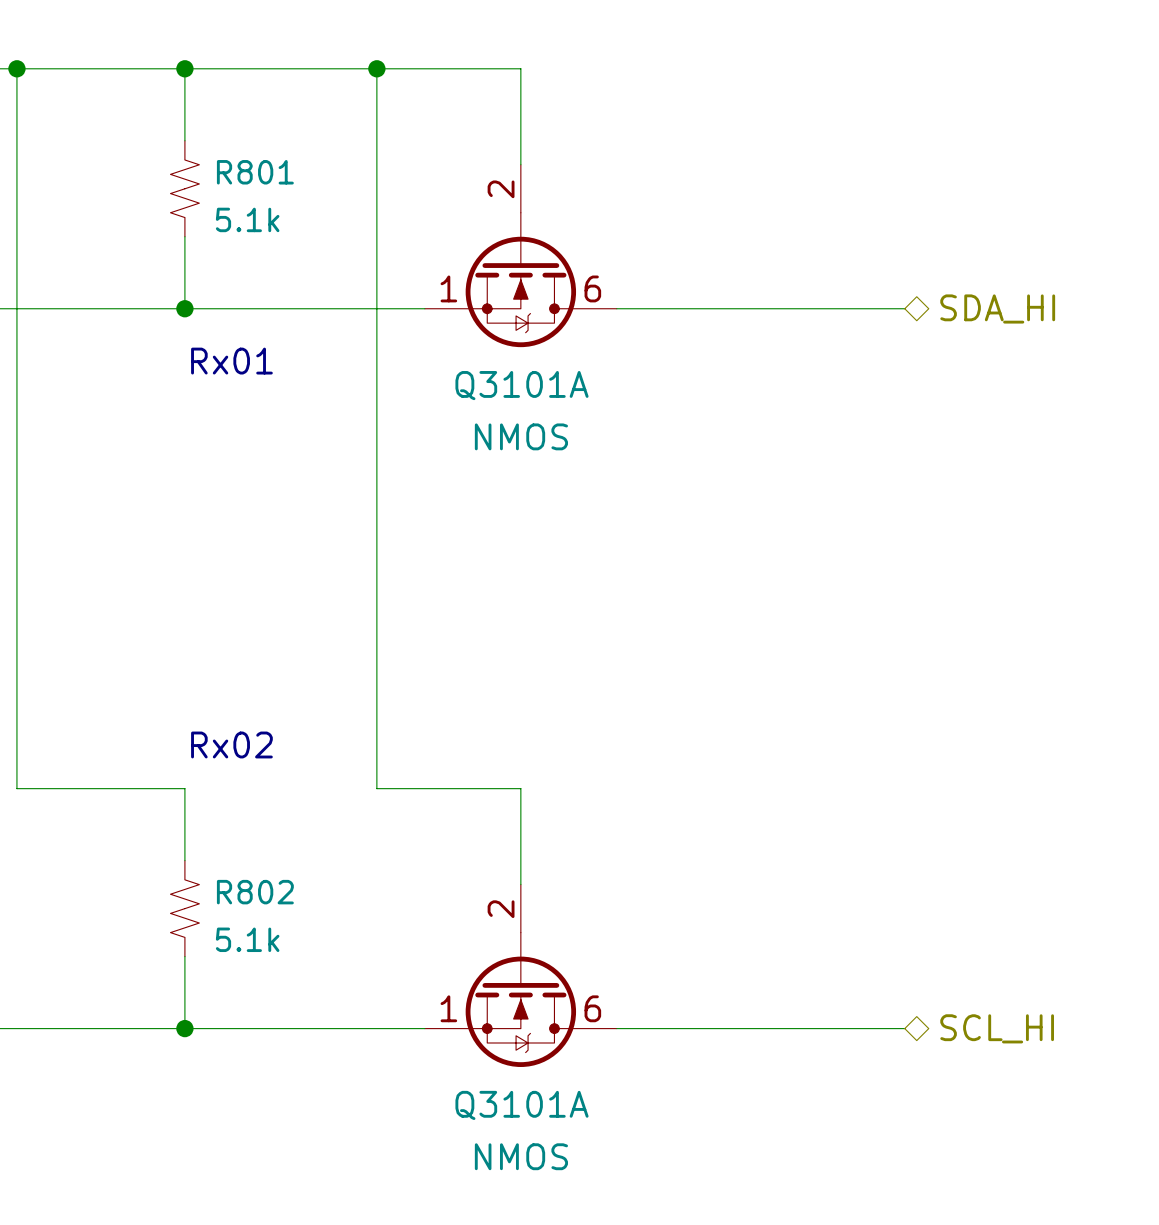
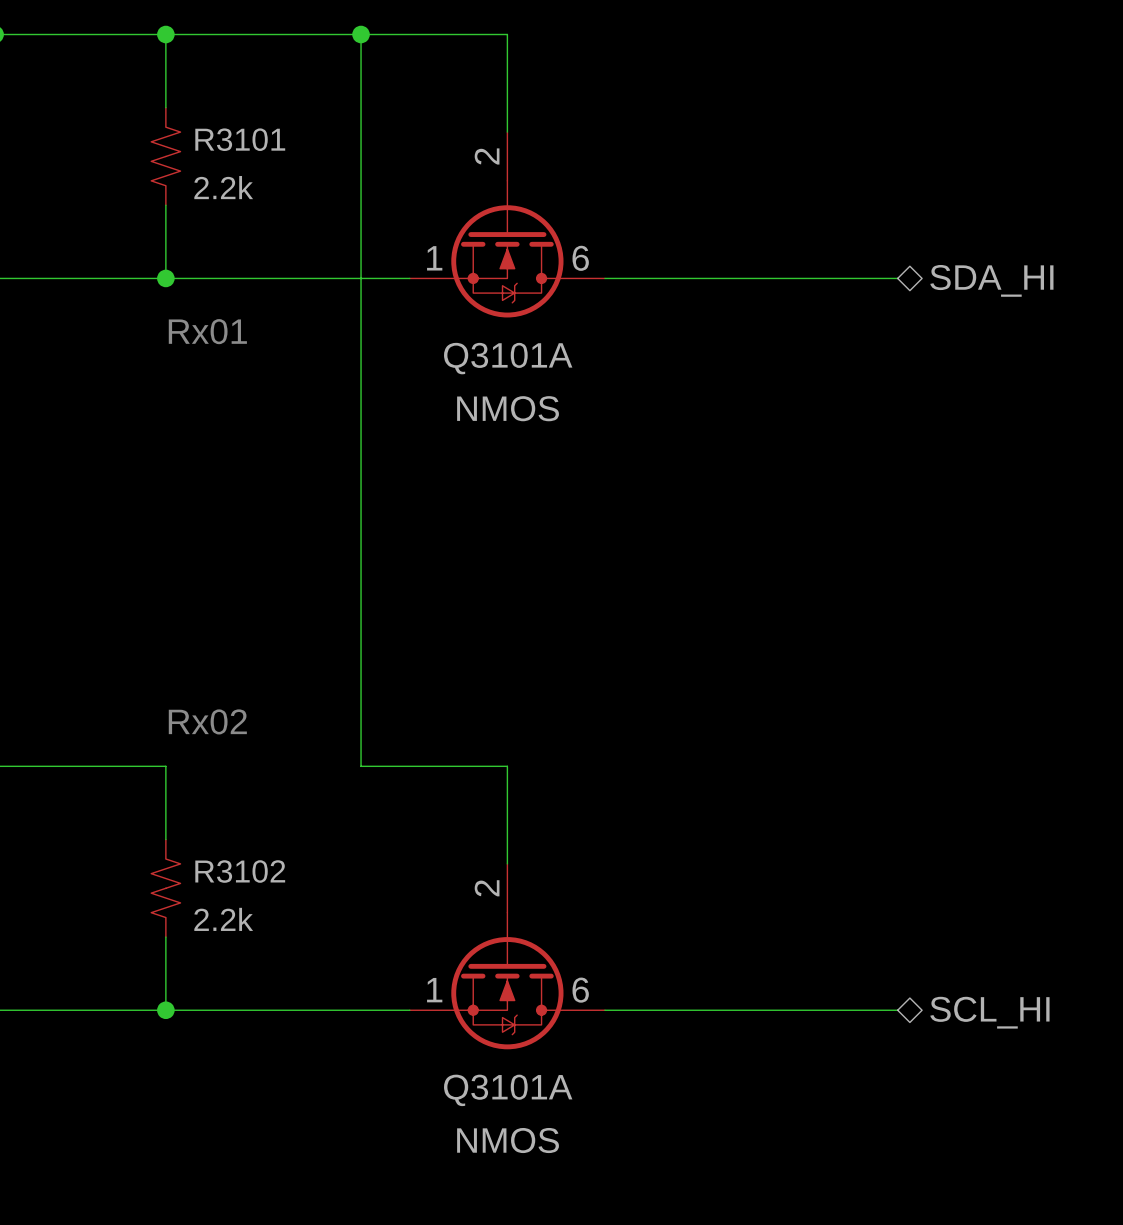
R801 name: R801 (255, 172) -> R3101 (240, 139)
R801 value: 5.1k (247, 219) -> 2.2k (223, 187)
R802 name: R802 (255, 892) -> R3102 (240, 871)
R802 value: 5.1k (247, 939) -> 2.2k (223, 919)

